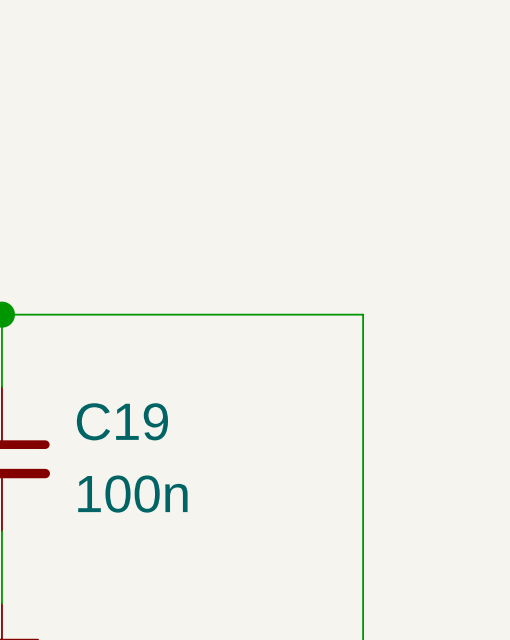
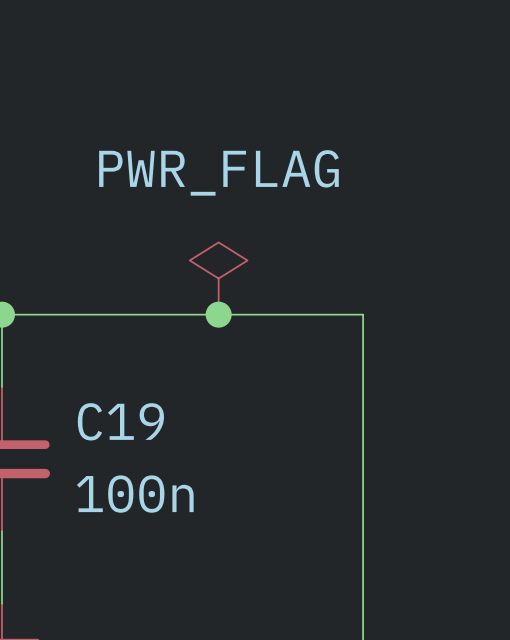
power symbol: none -> PWR_FLAG (218, 278)
junction: none -> (218, 314)

